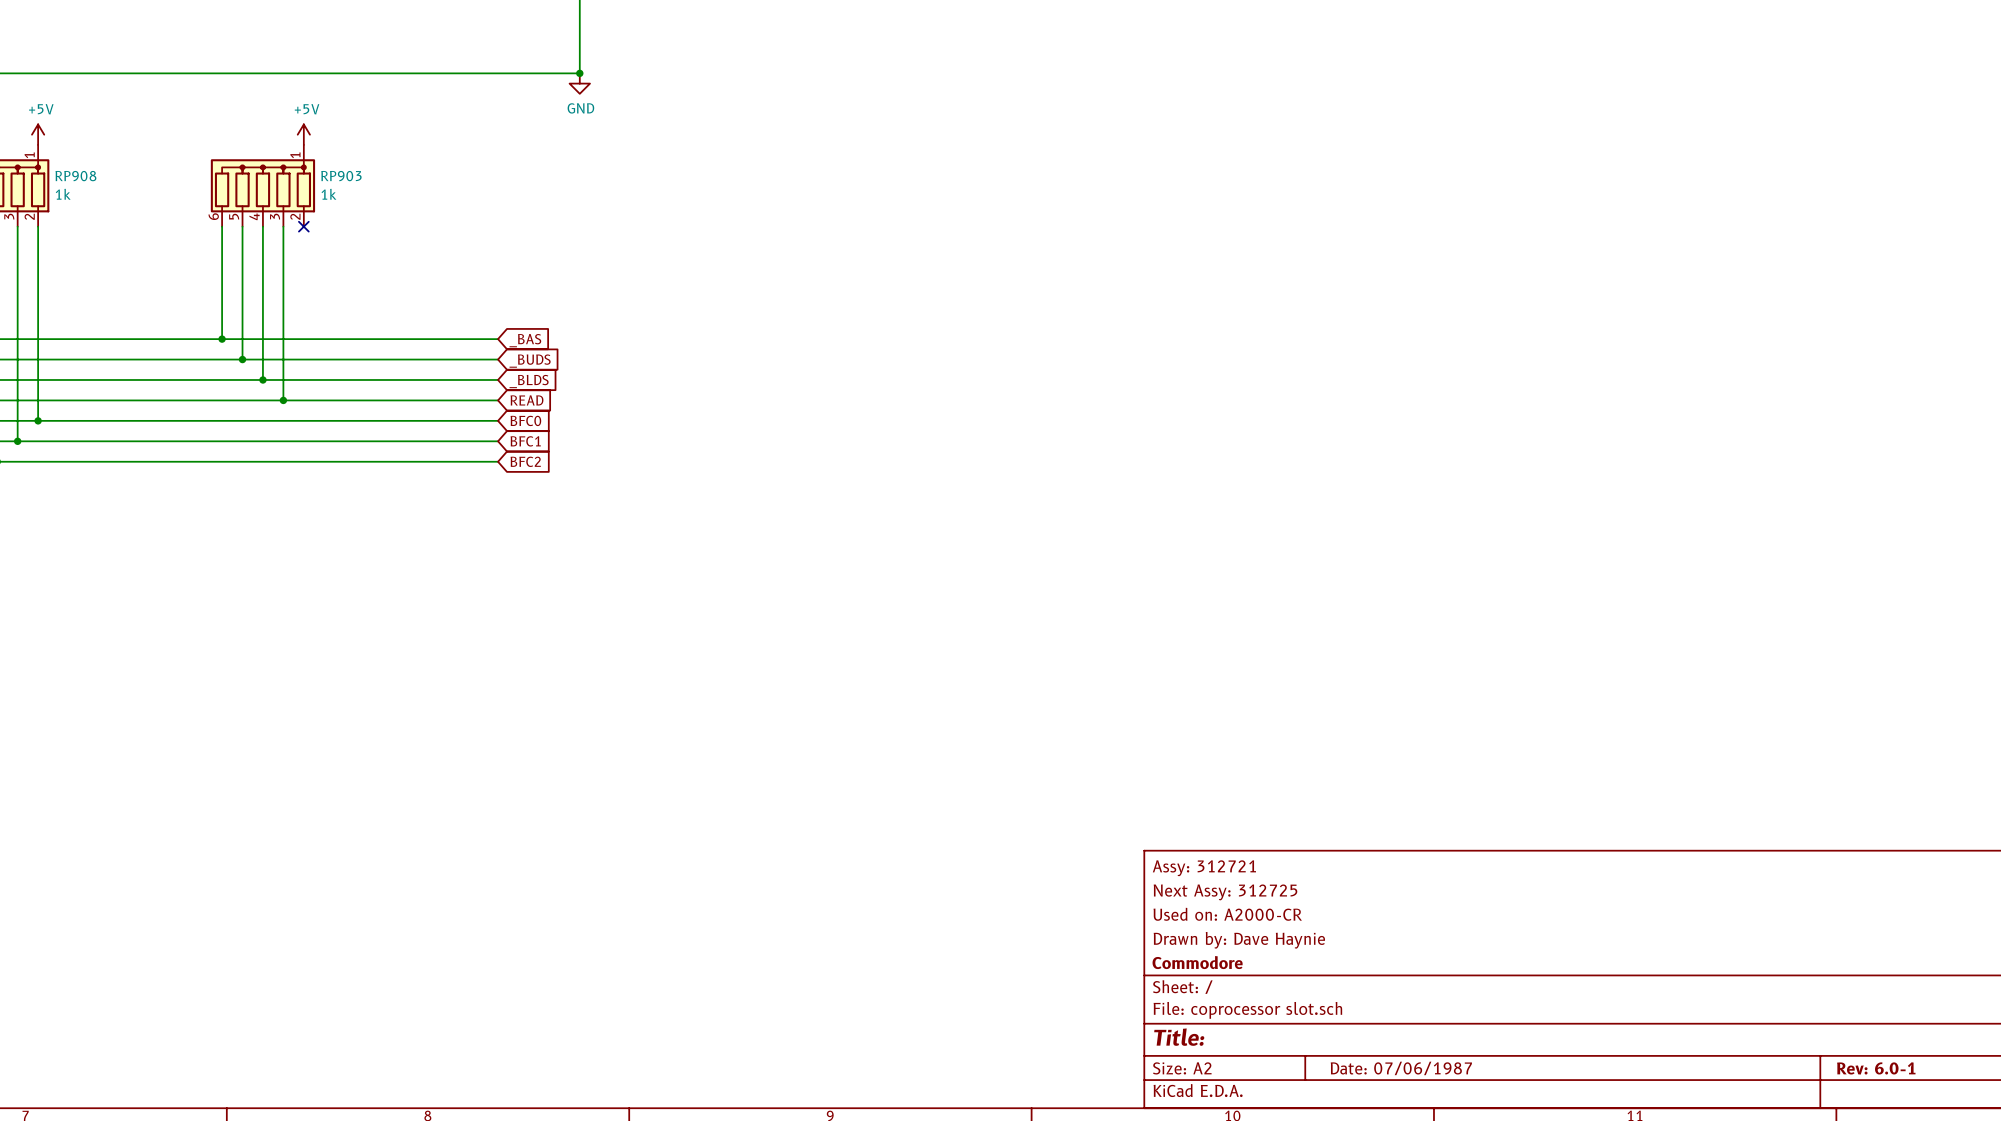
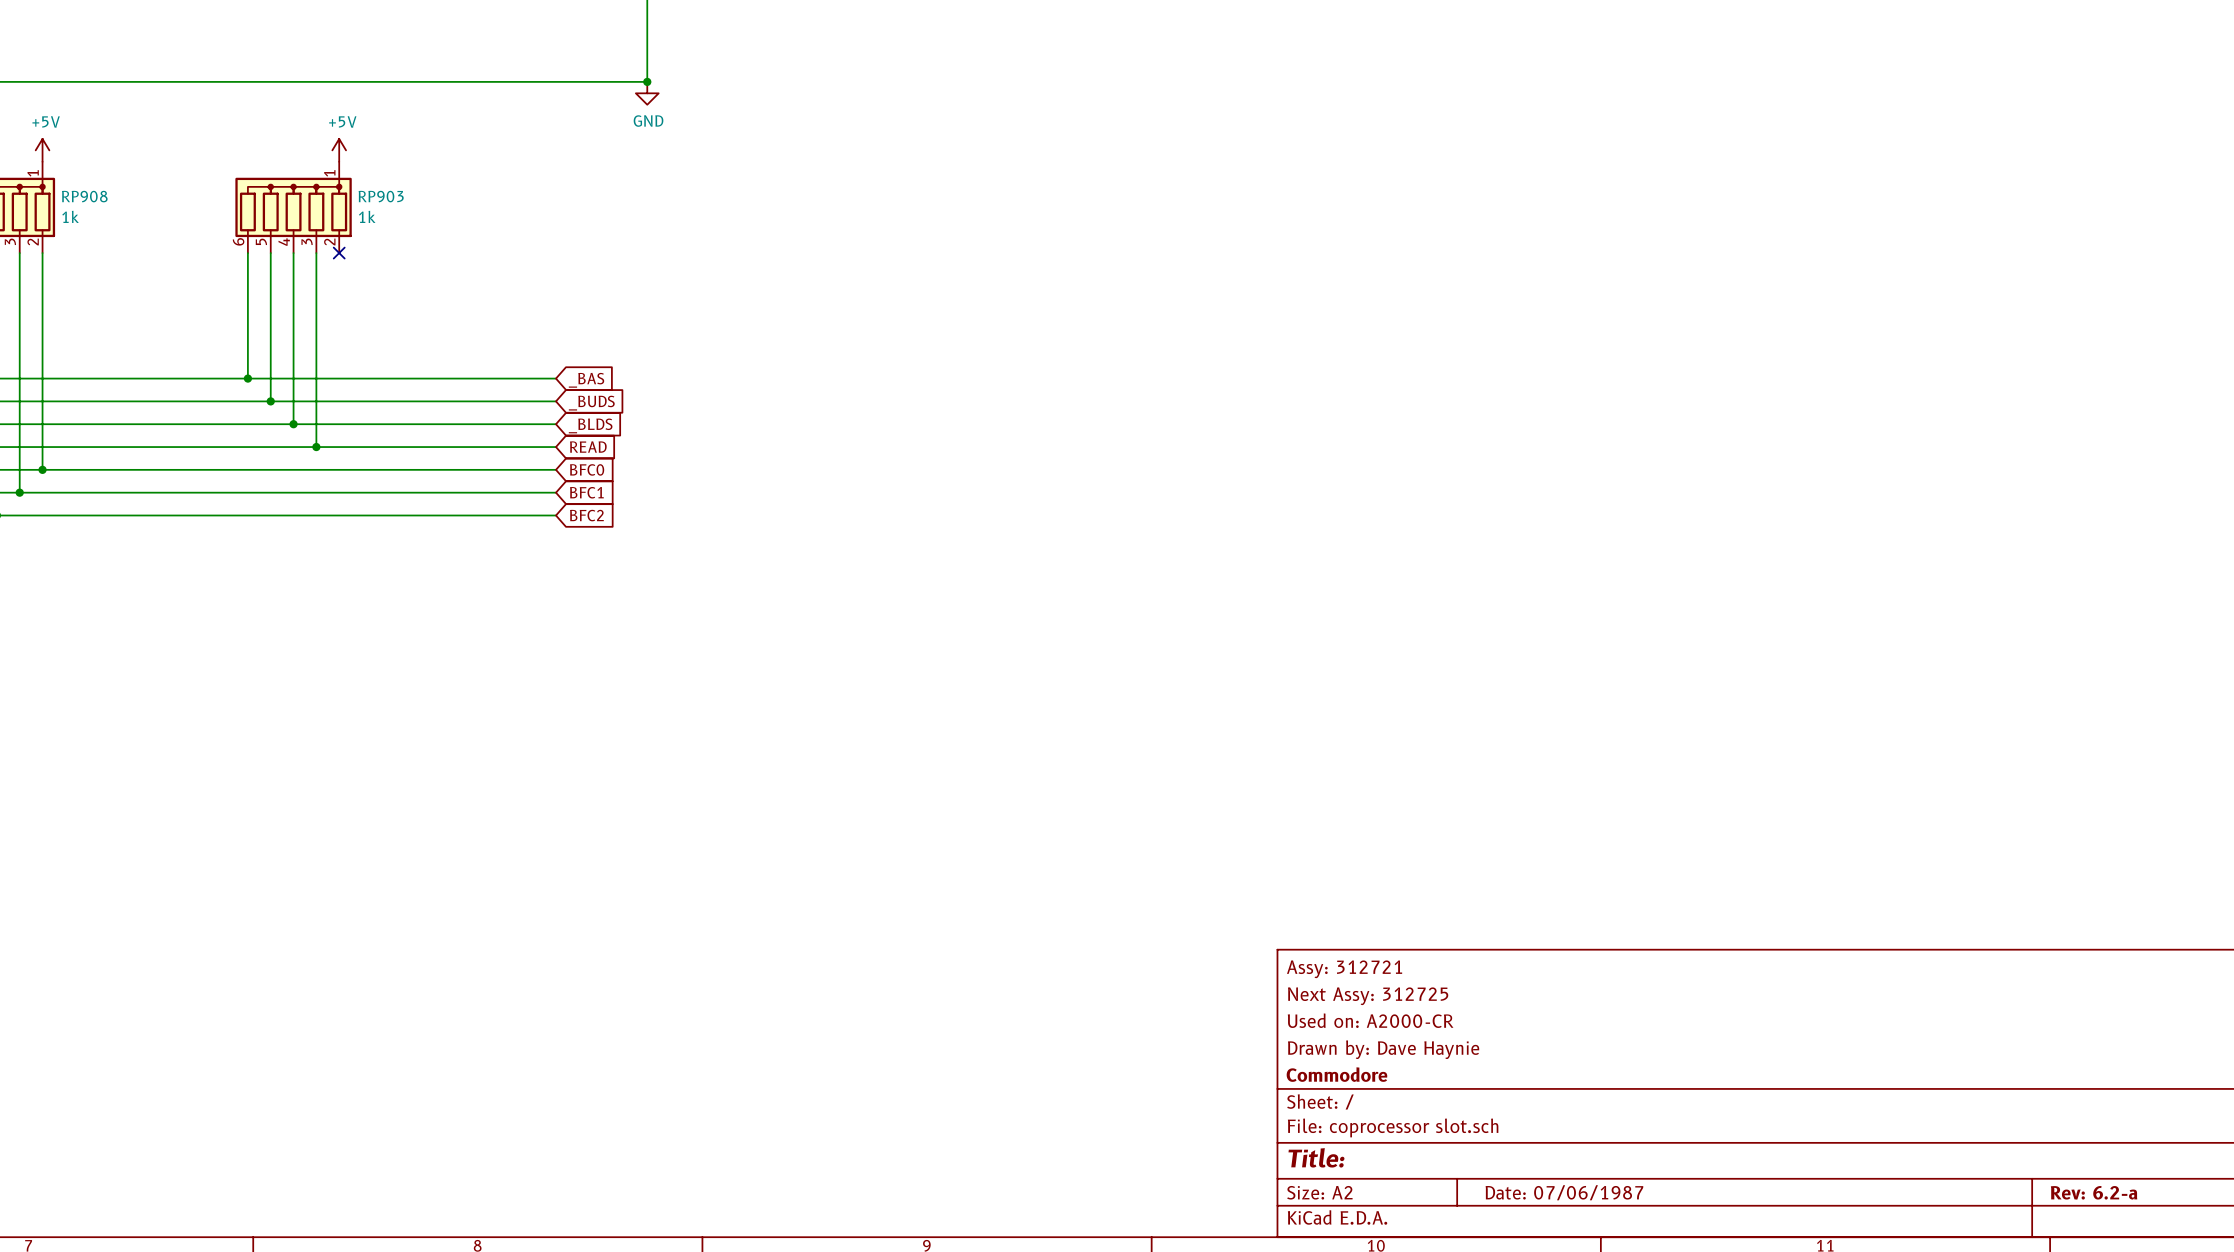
title block: Rev: 6.0-1 (1876, 1068) -> Rev: 6.2-a (2094, 1192)

